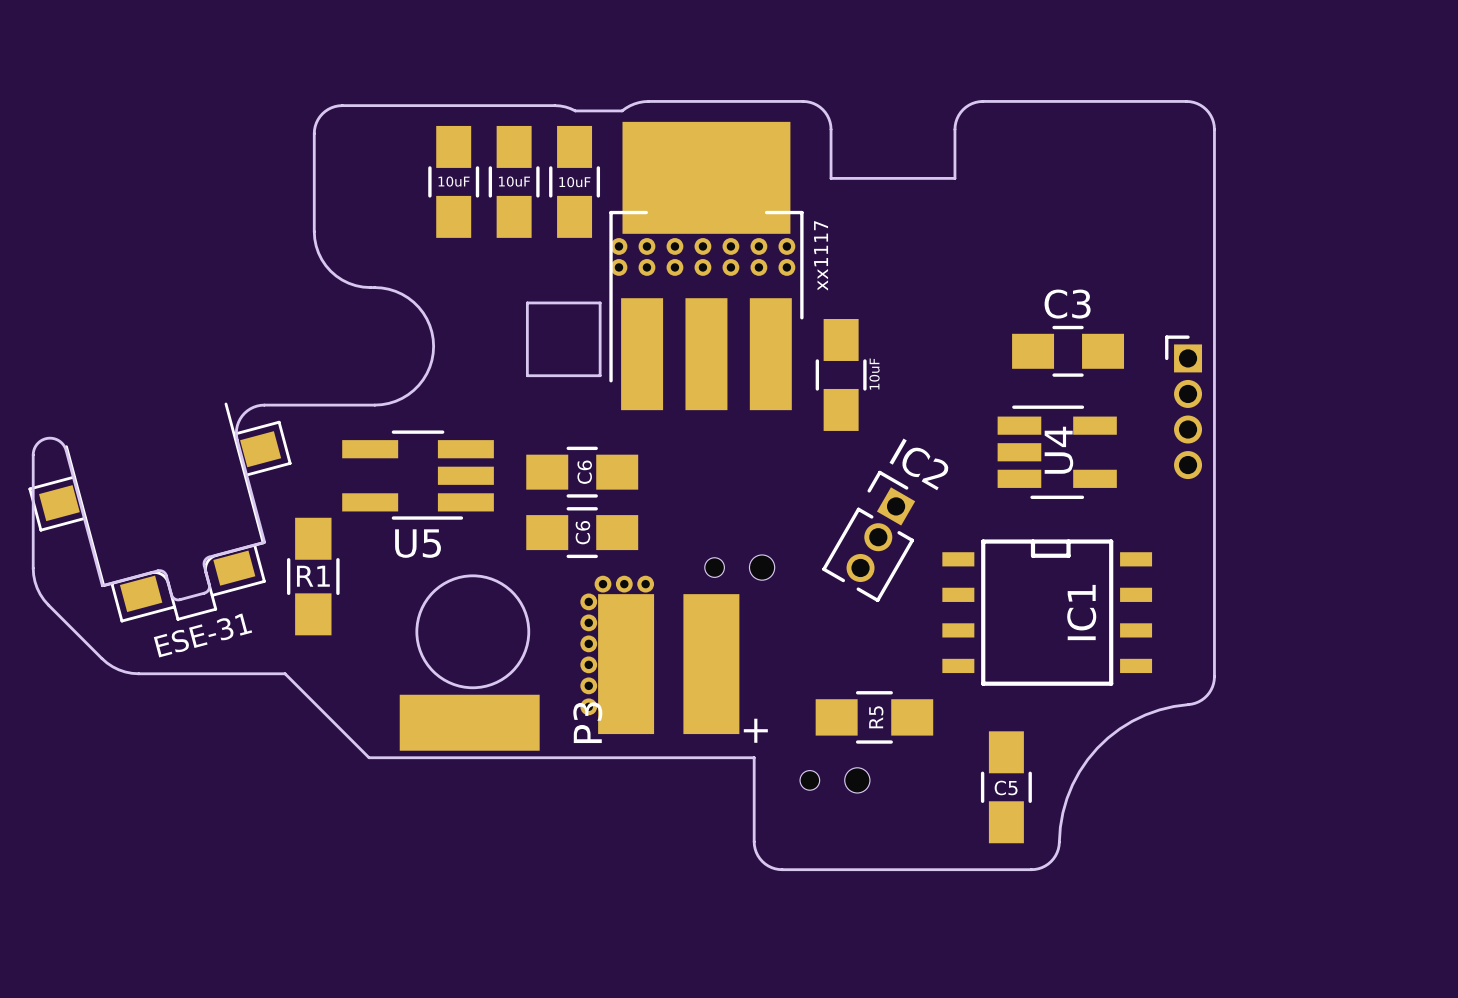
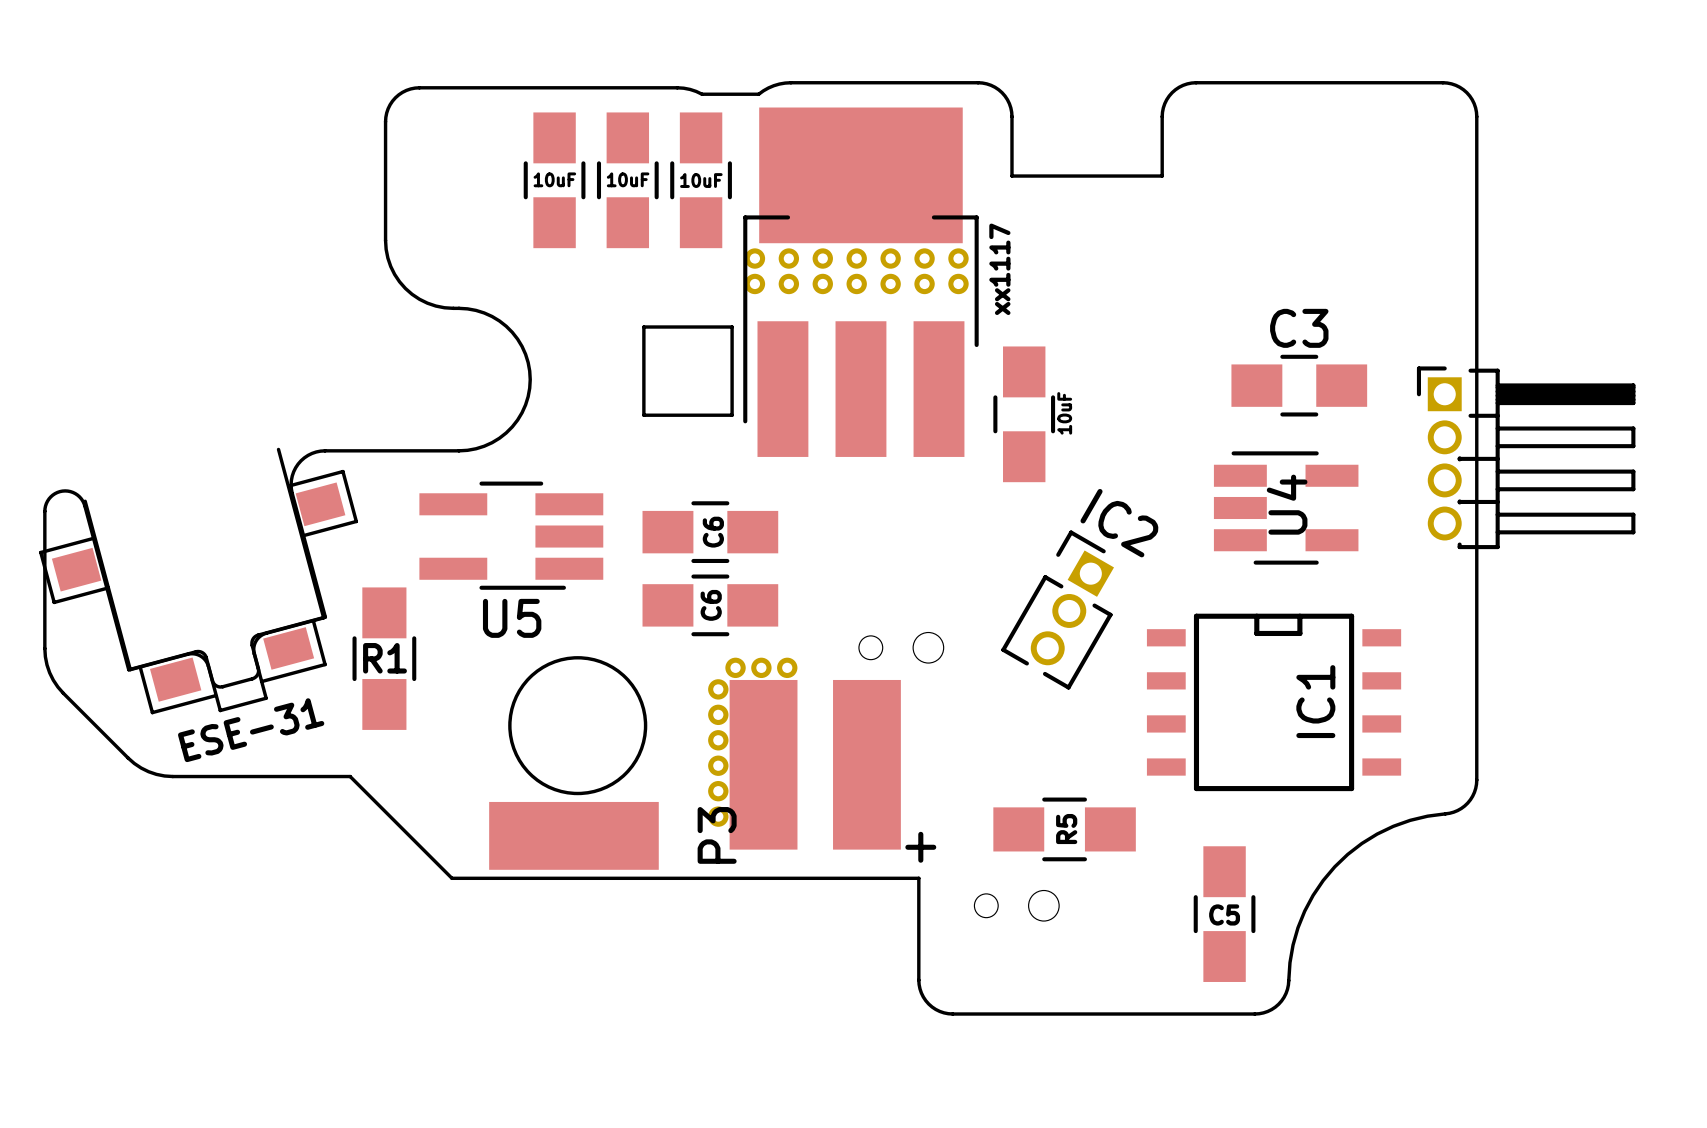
part: none -> (1526, 457)

